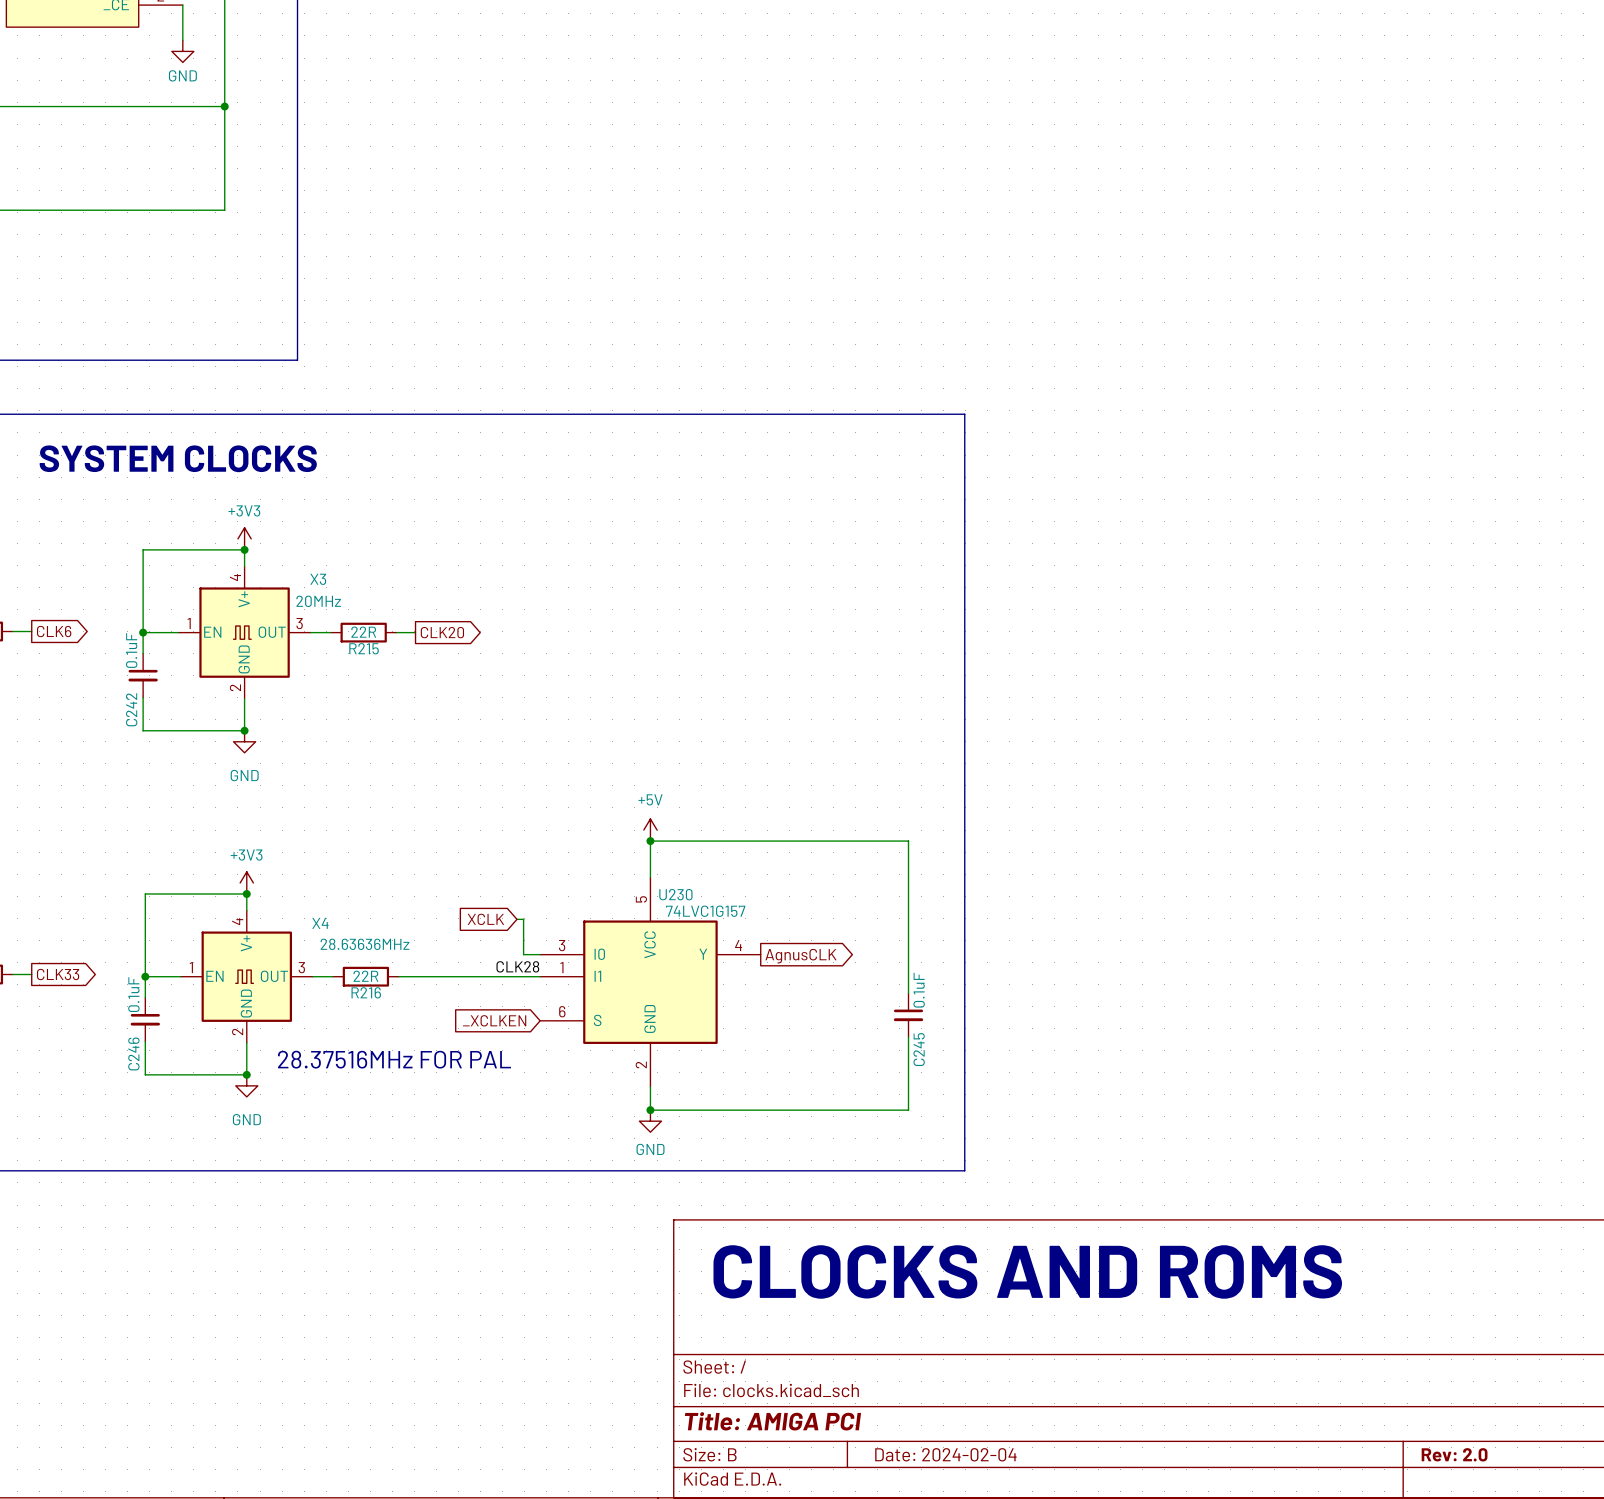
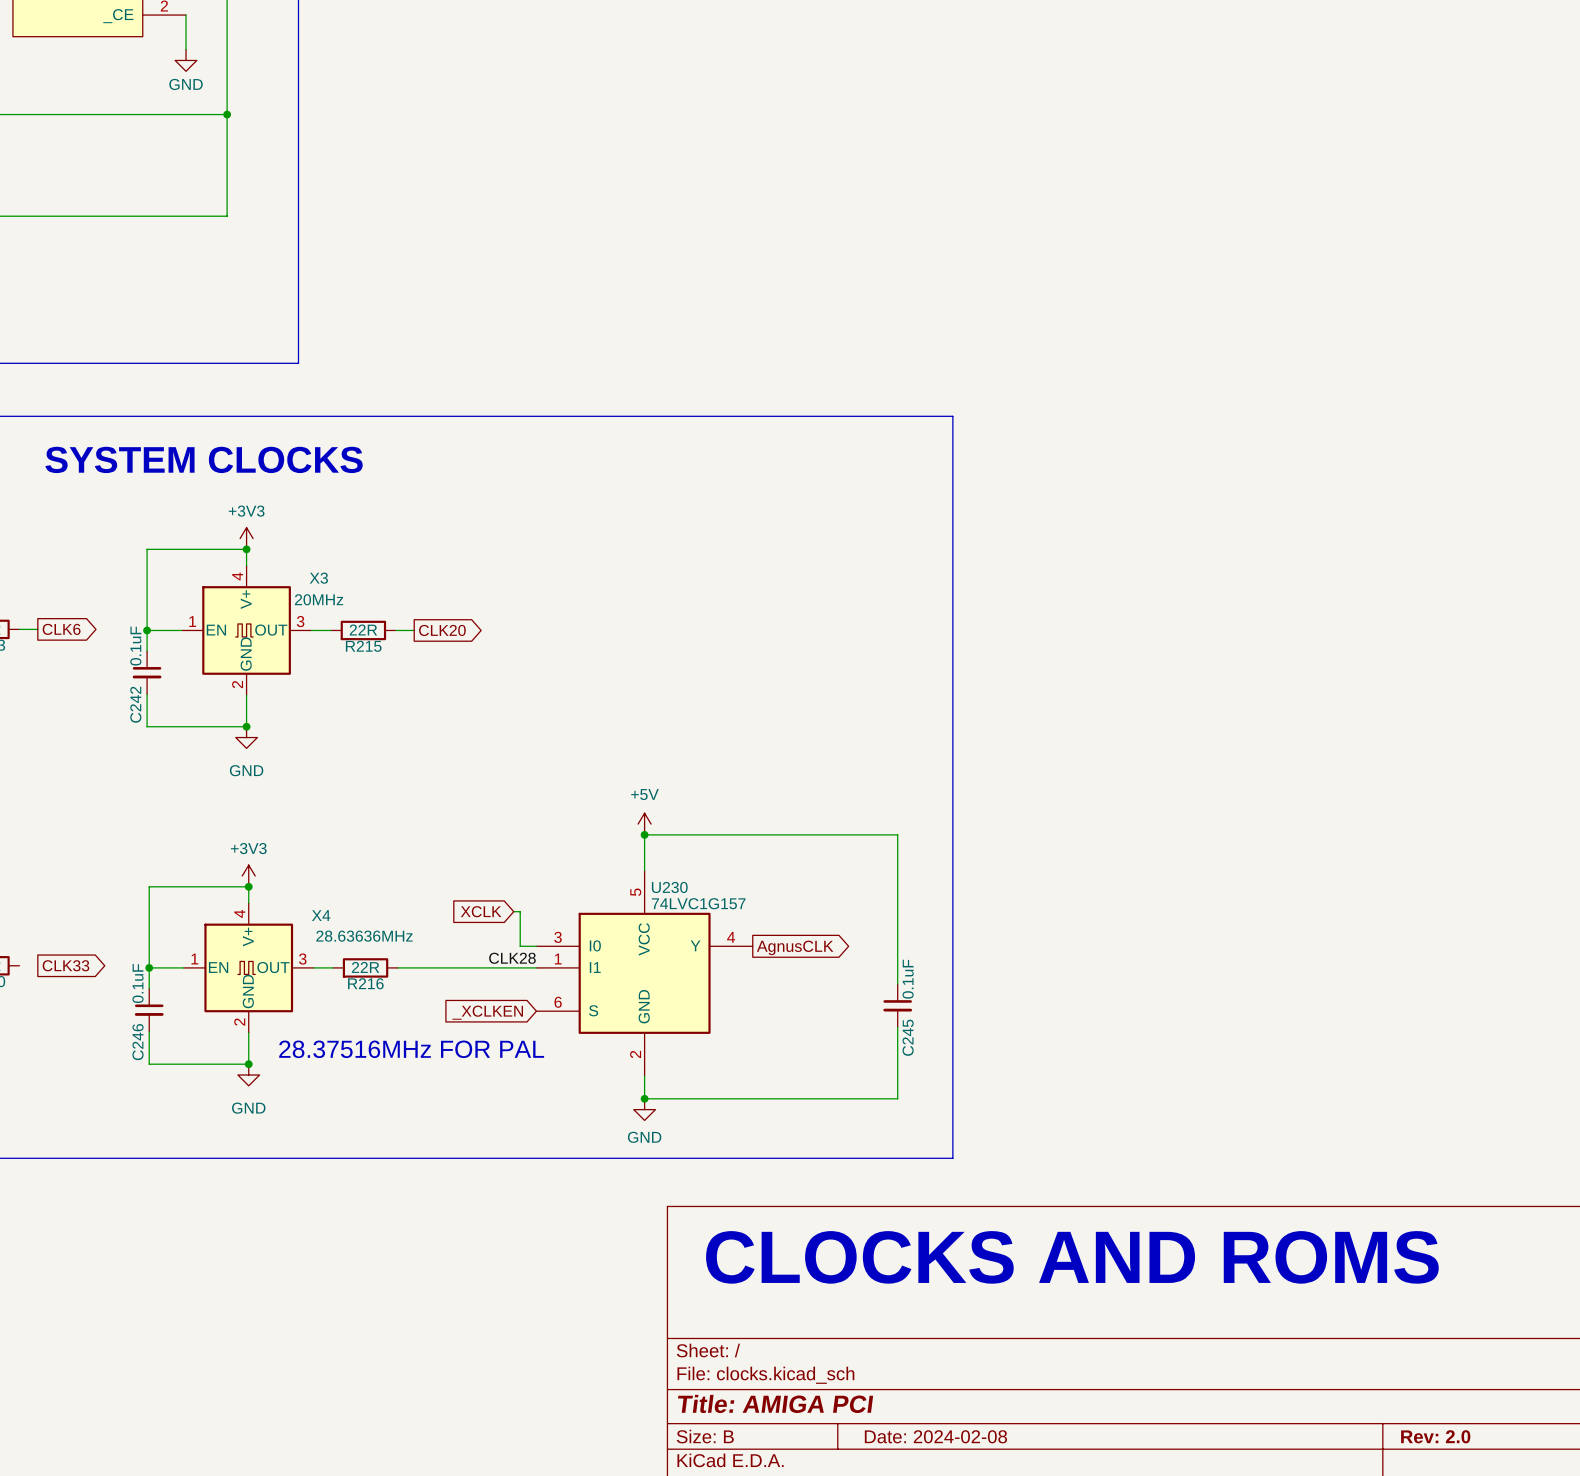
wire: (12, 974) (31, 974) -> none
title block: Date: 2024-02-04 (945, 1454) -> Date: 2024-02-08 (935, 1436)

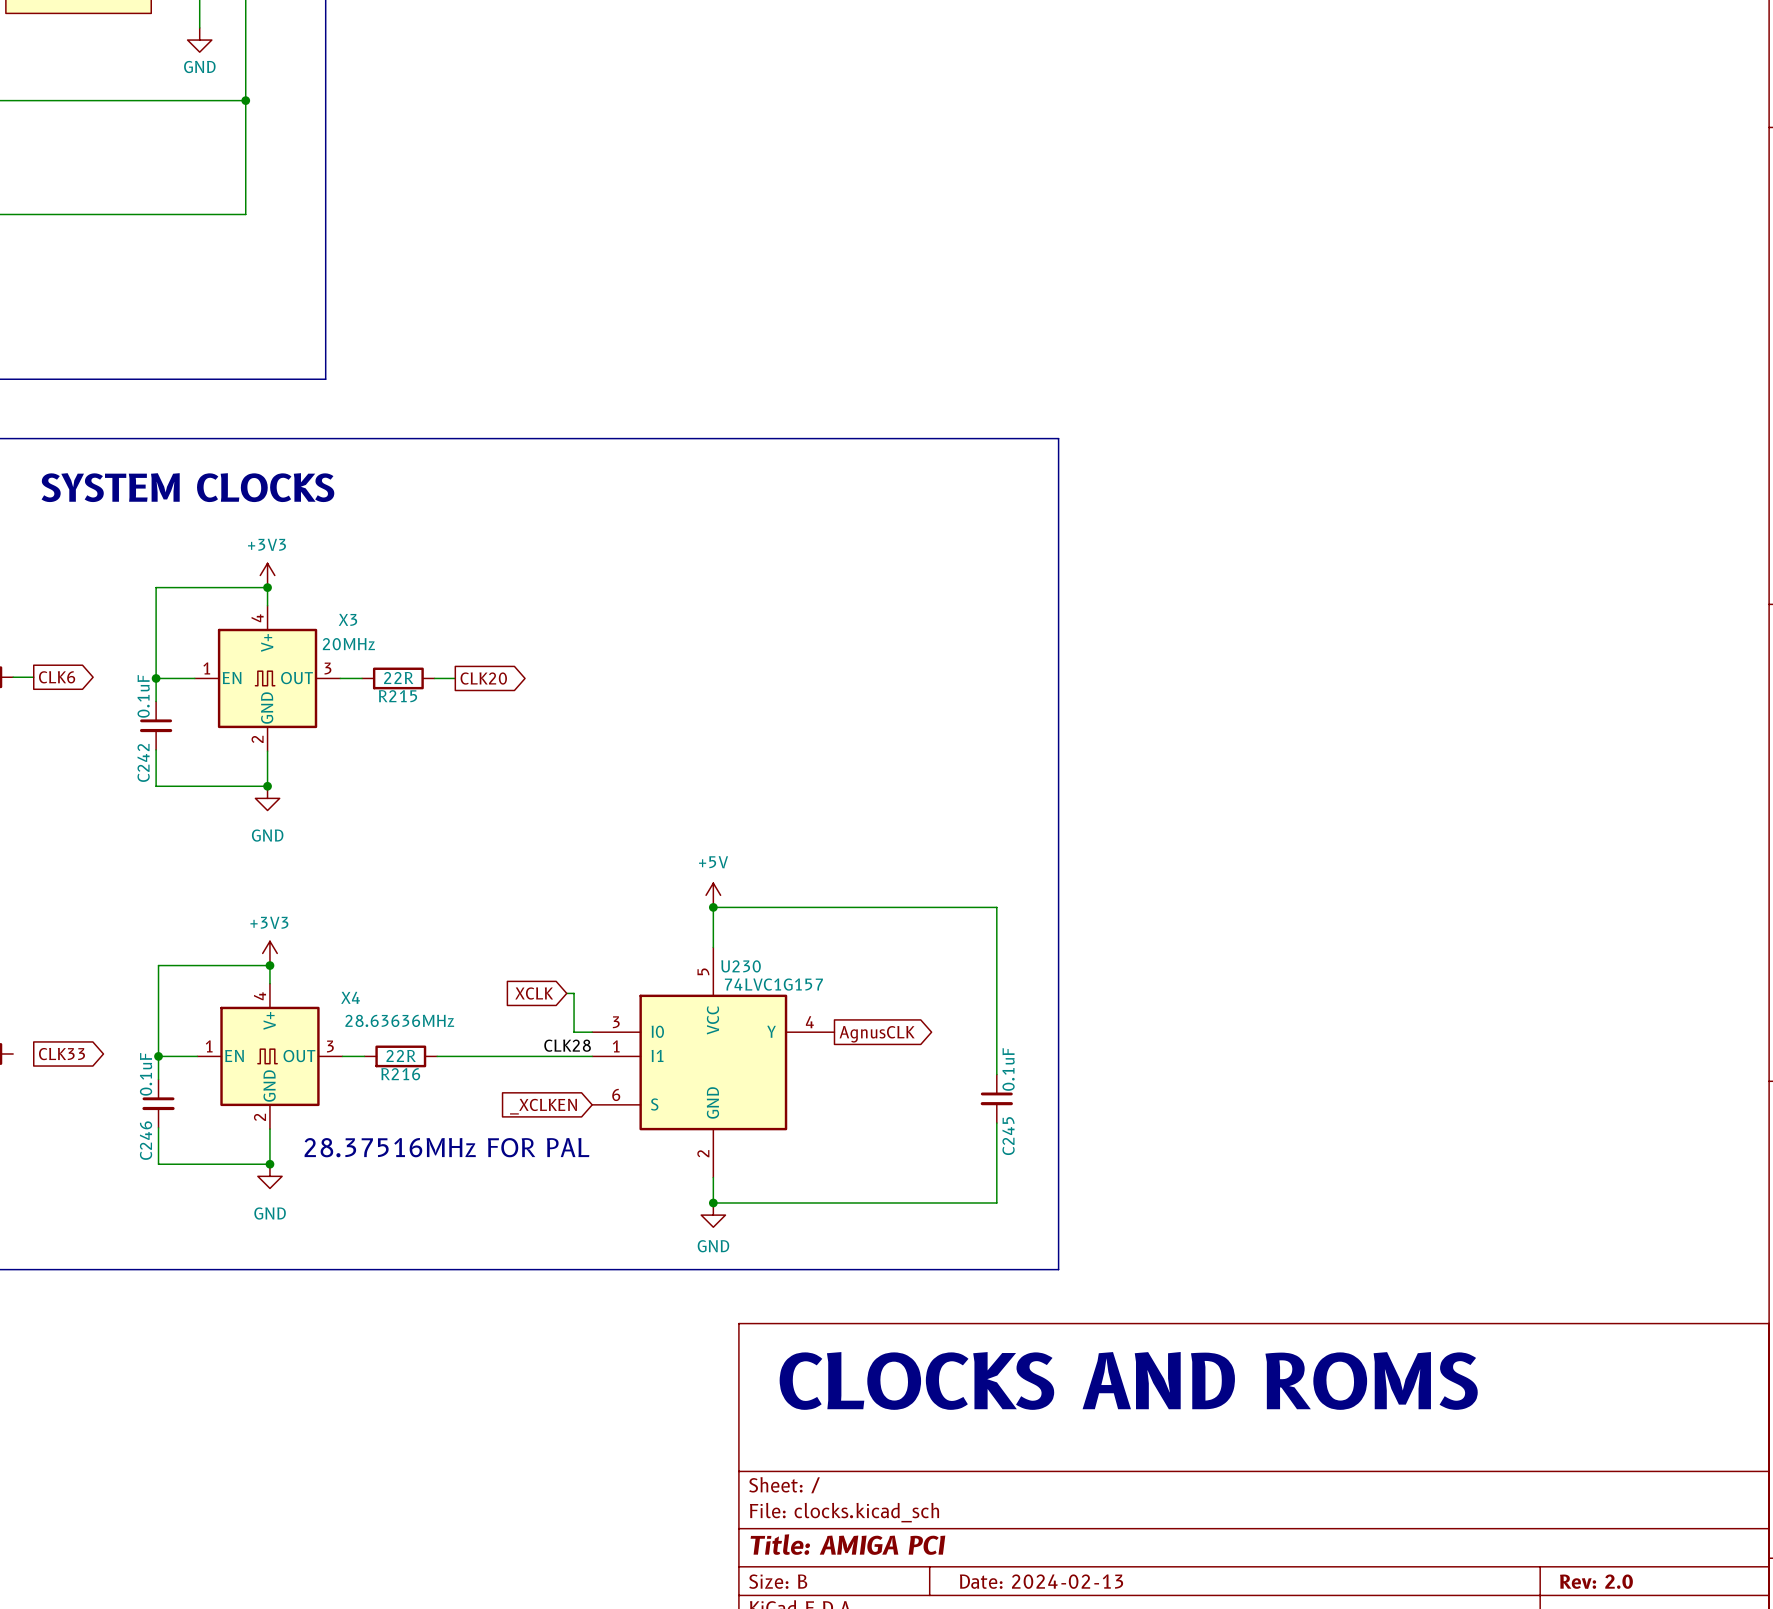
title block: Date: 2024-02-08 (935, 1436) -> Date: 2024-02-13 (1041, 1581)

